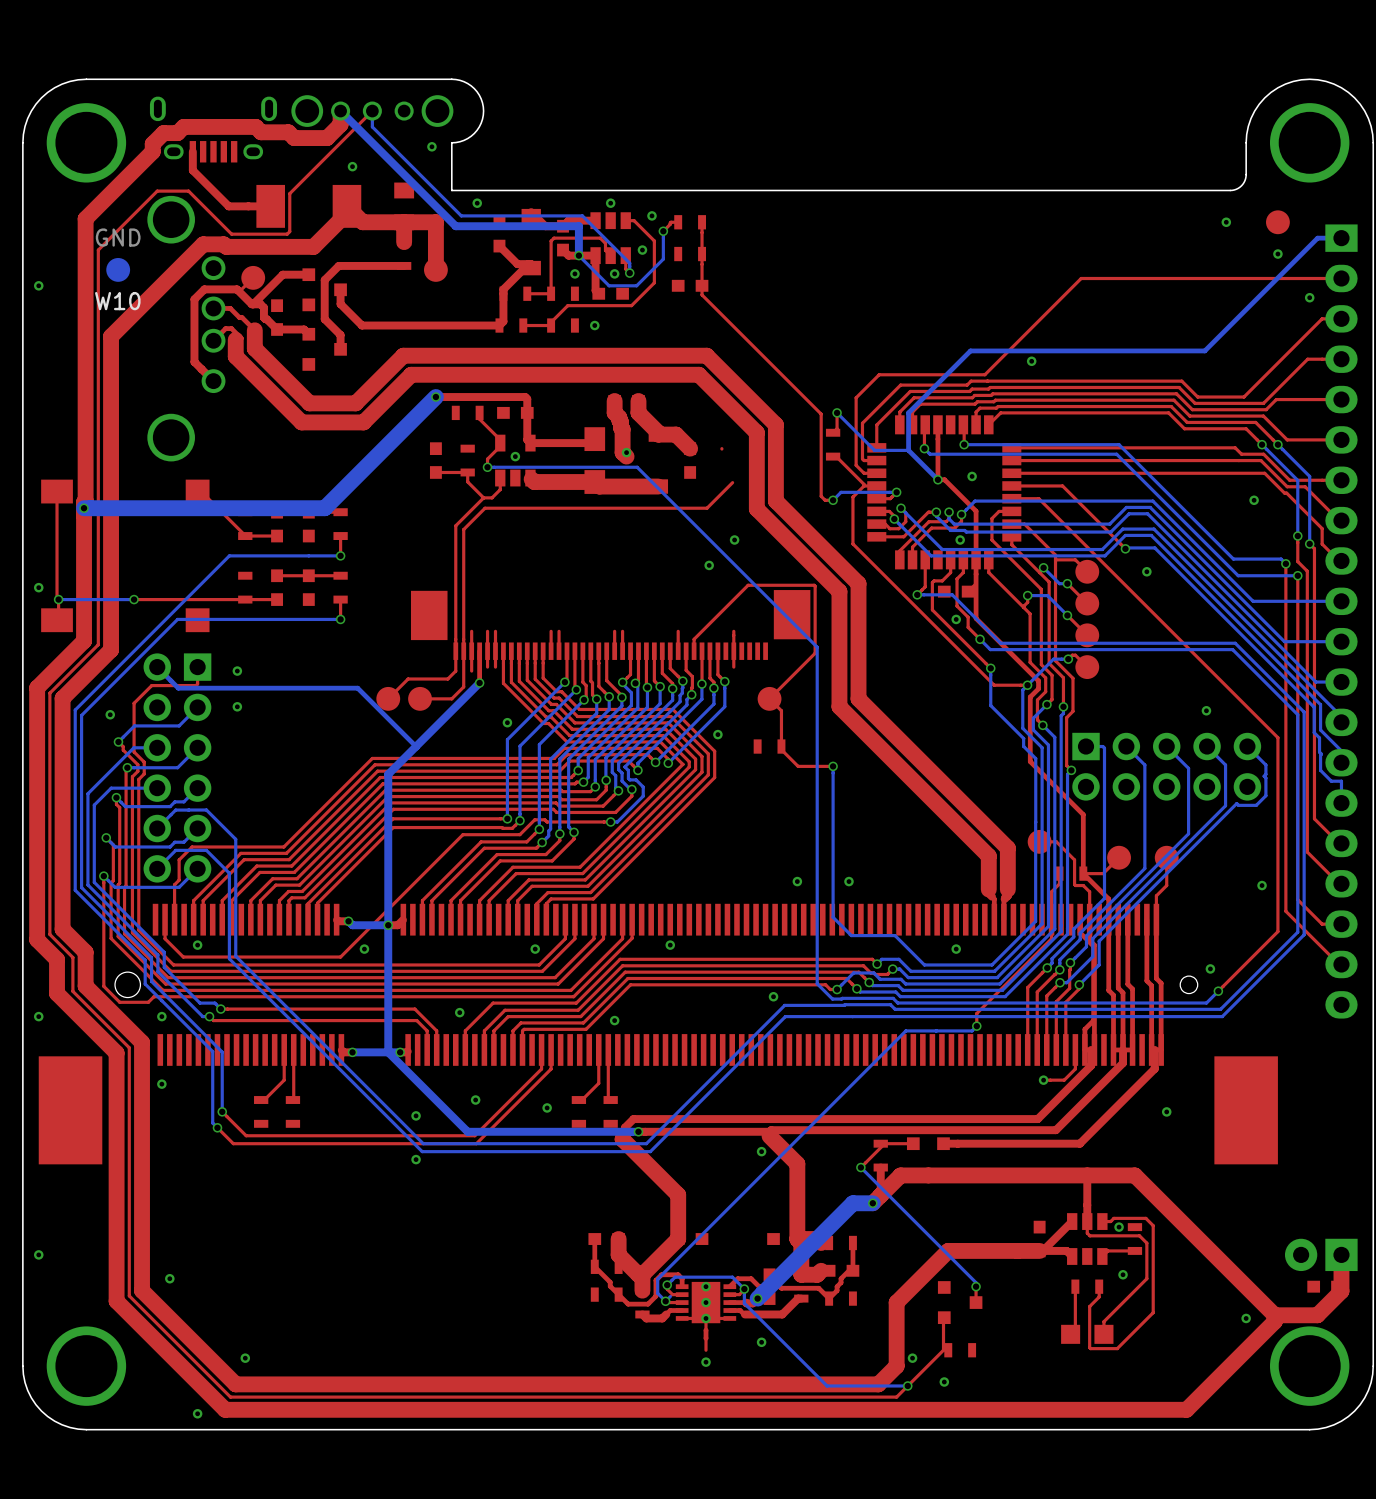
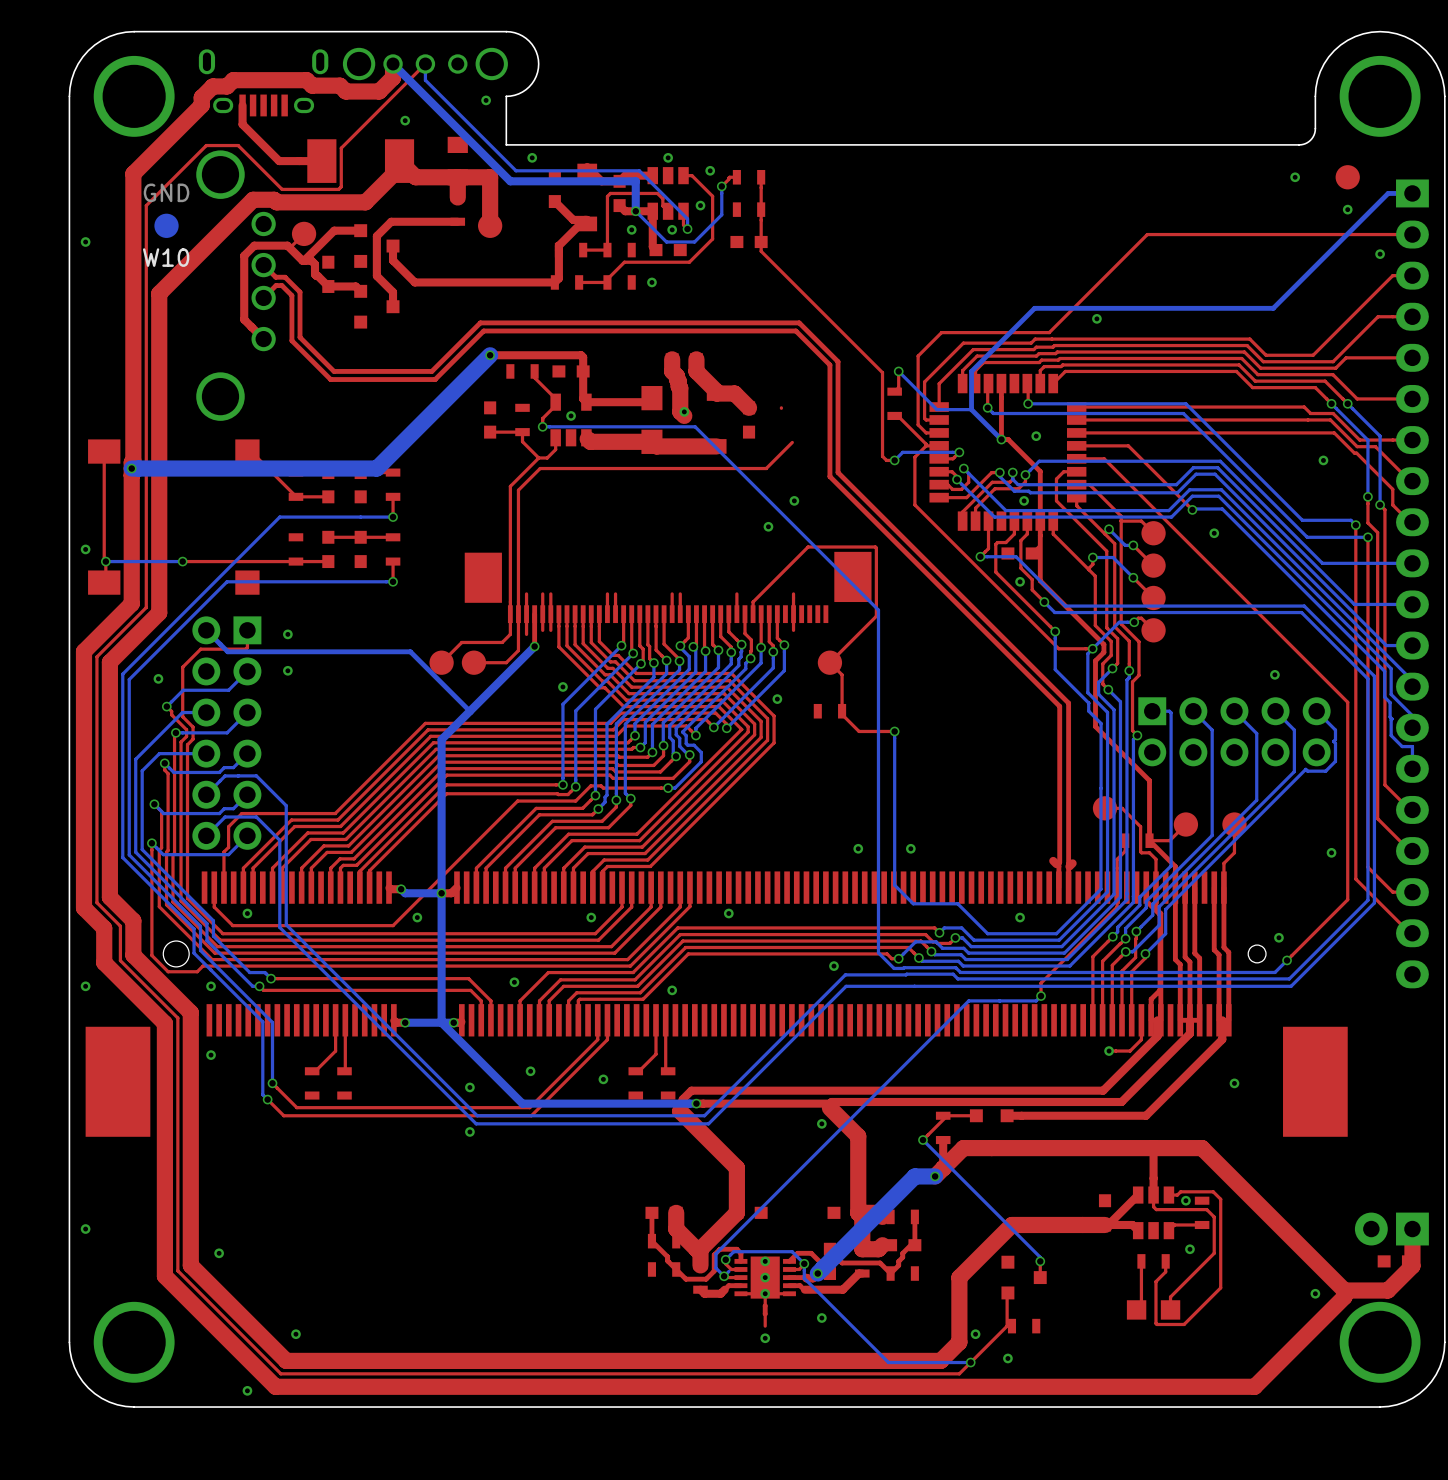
top track: (213, 308) (230, 308) (239, 317) (242, 317) (254, 330) (254, 348) (309, 403) (355, 403) (403, 355) (706, 355) (775, 424) (775, 501) (858, 583) (858, 698) (1007, 848) (1007, 895) -> (263, 265) (275, 277) (285, 277) (300, 292) (300, 337) (334, 371) (431, 371) (480, 322) (799, 322) (838, 361) (838, 472) (1068, 703) (1068, 864)
top track: (241, 338) (235, 339) (235, 356) (301, 422) (363, 422) (411, 374) (698, 374) (756, 432) (756, 508) (839, 591) (839, 706) (988, 856) (988, 892) -> (291, 295) (291, 340) (330, 379) (435, 379) (483, 330) (795, 330) (829, 365) (829, 476) (1059, 706) (1058, 866)

